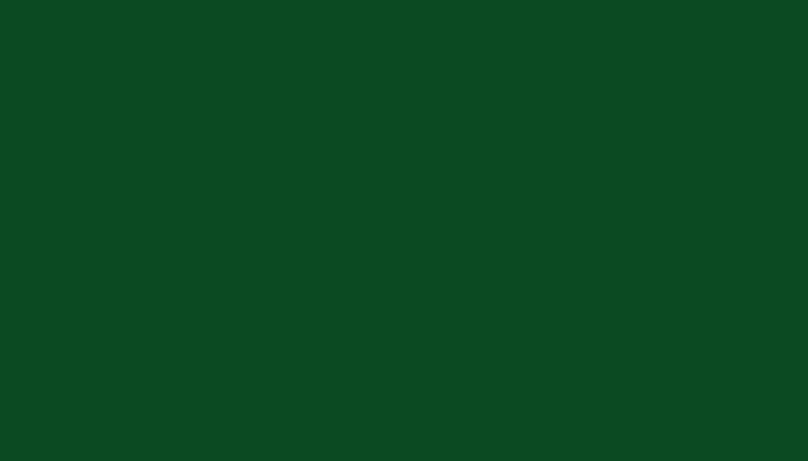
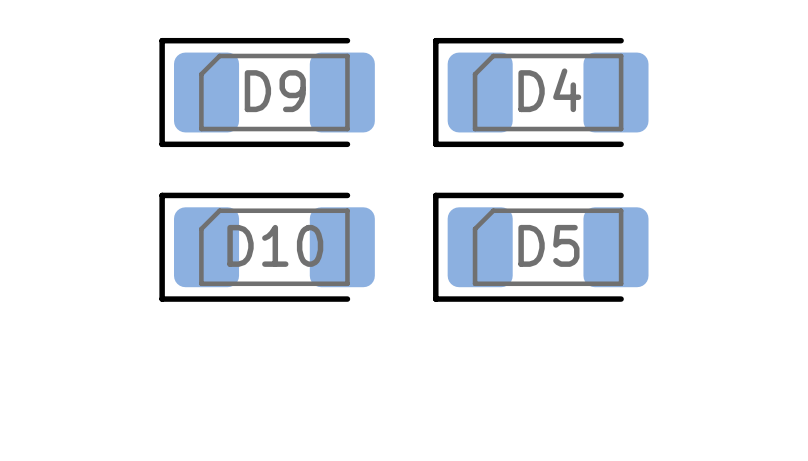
D9: none -> (267, 92)
D4: none -> (540, 92)
D10: none -> (267, 247)
D5: none -> (540, 247)

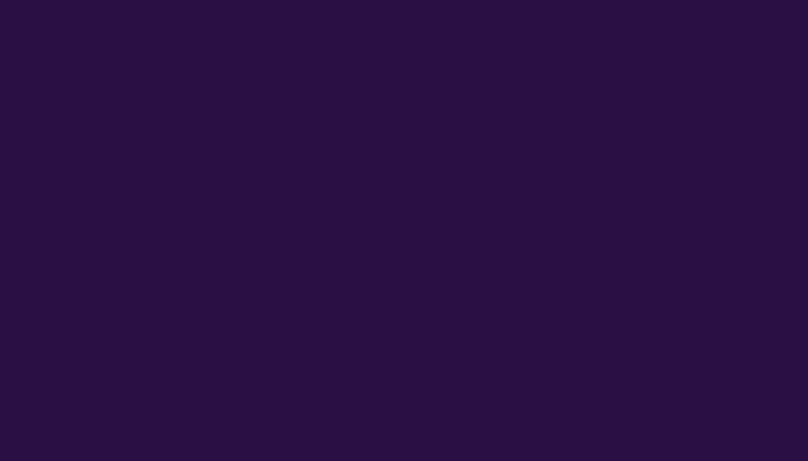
D9: (267, 92) -> none
D4: (540, 92) -> none
D10: (267, 247) -> none
D5: (540, 247) -> none

